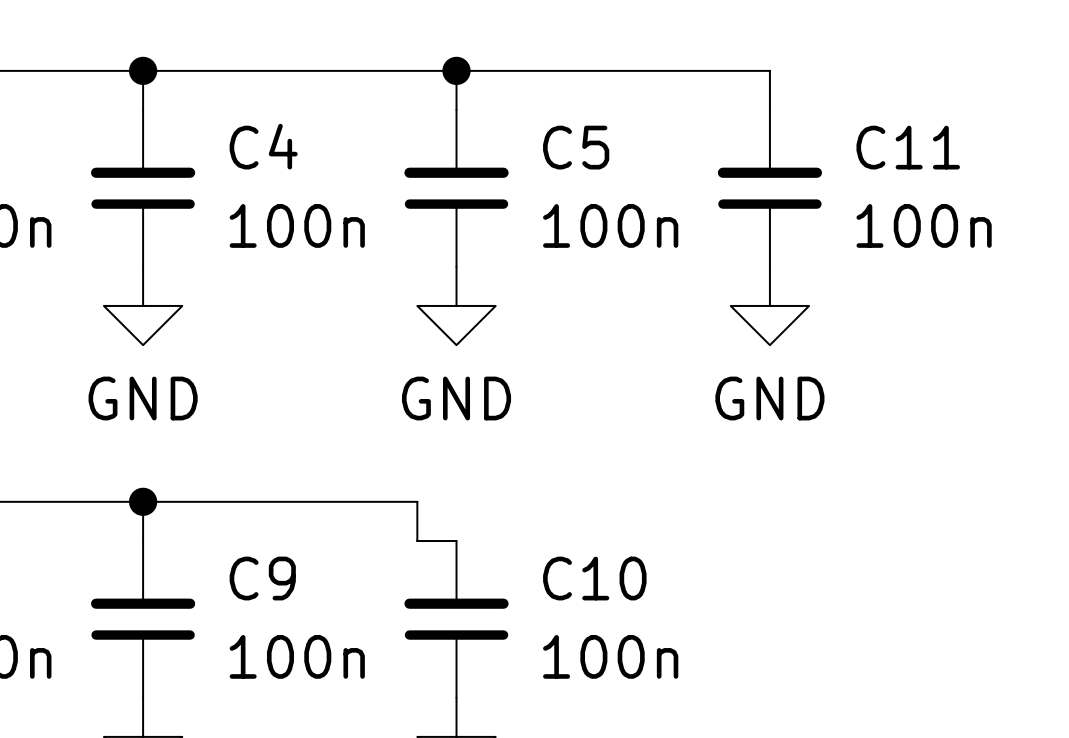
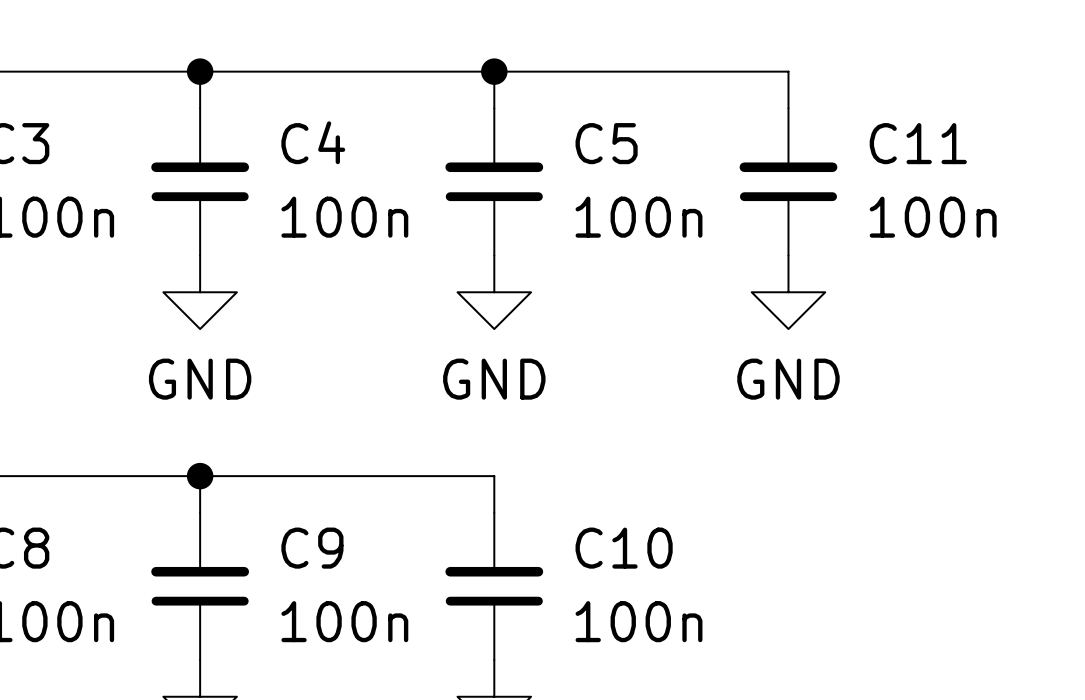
wire: (417, 501) (417, 541) (456, 541) -> (457, 476) (494, 476) (494, 512)

